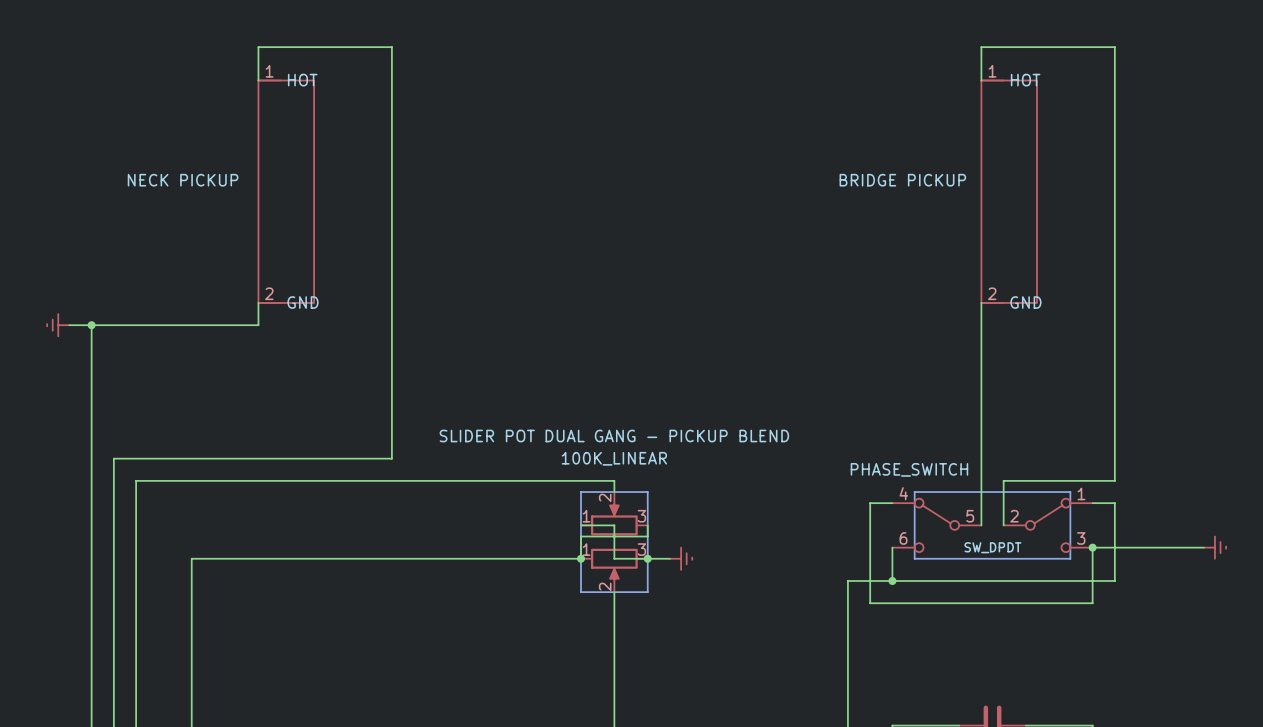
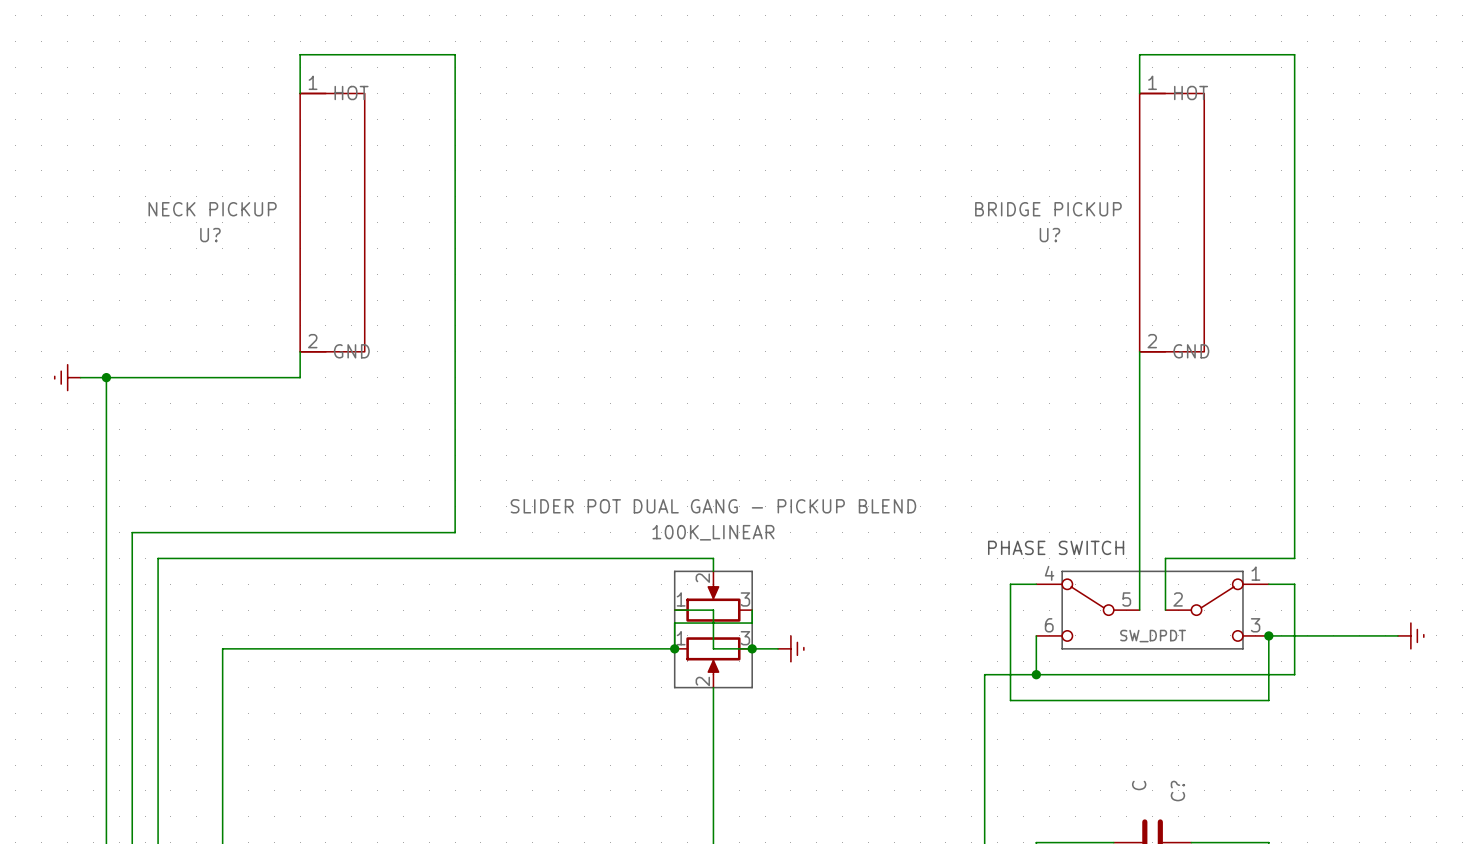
U? name: none -> U? (210, 235)
PHASE_SWITCH name: PHASE_SWITCH (909, 469) -> U? (1049, 235)
text: none -> PHASE SWITCH (1056, 547)
C? value: none -> C (1139, 785)
C? name: none -> C? (1177, 791)

